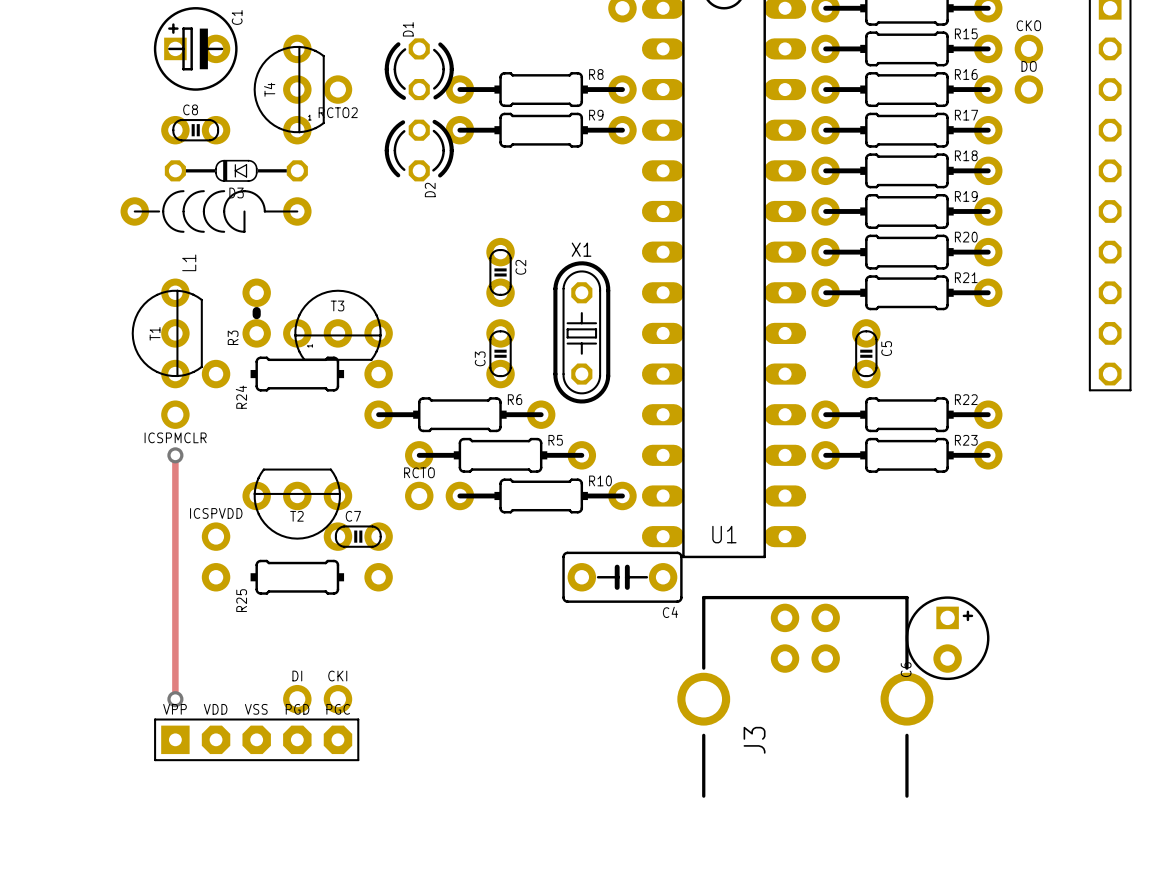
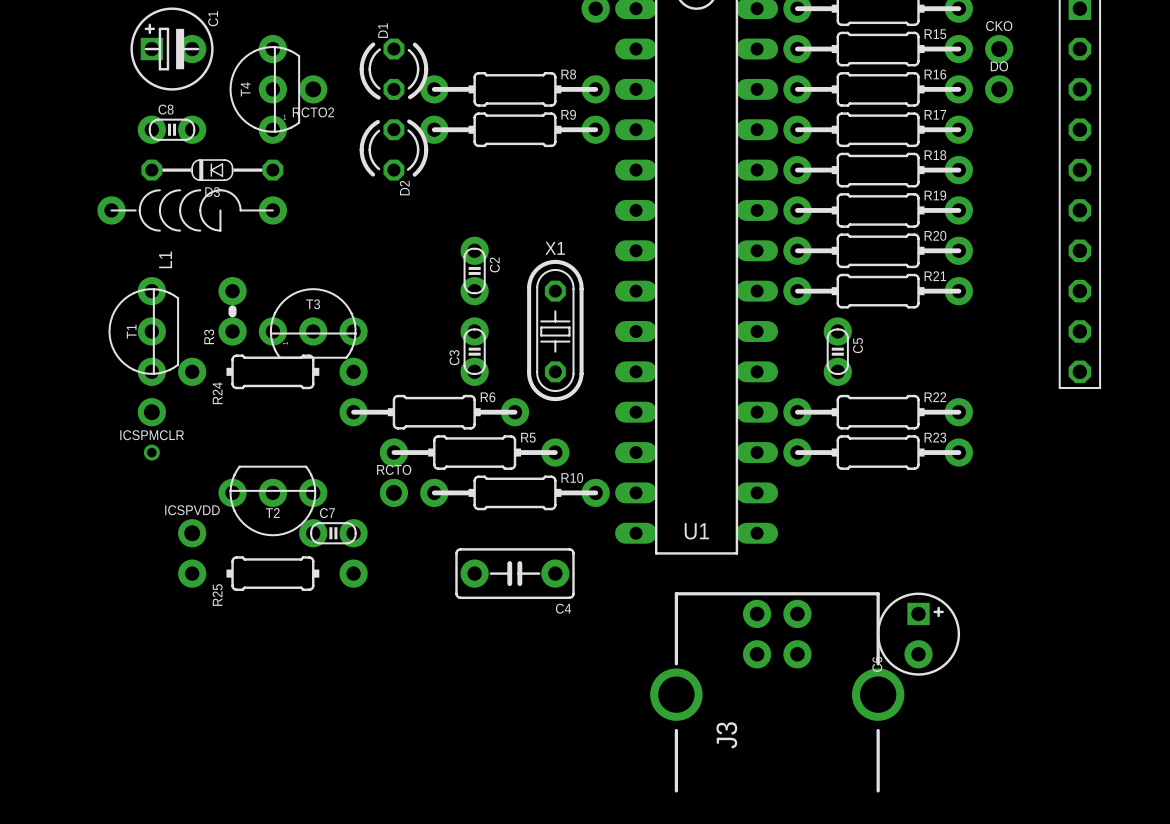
track: (175, 455) (175, 699) -> none
C4 position: (622, 577) -> (515, 573)
via: (175, 699) -> none
DI: (297, 699) -> none
CKI: (337, 699) -> none
part: (256, 739) -> none

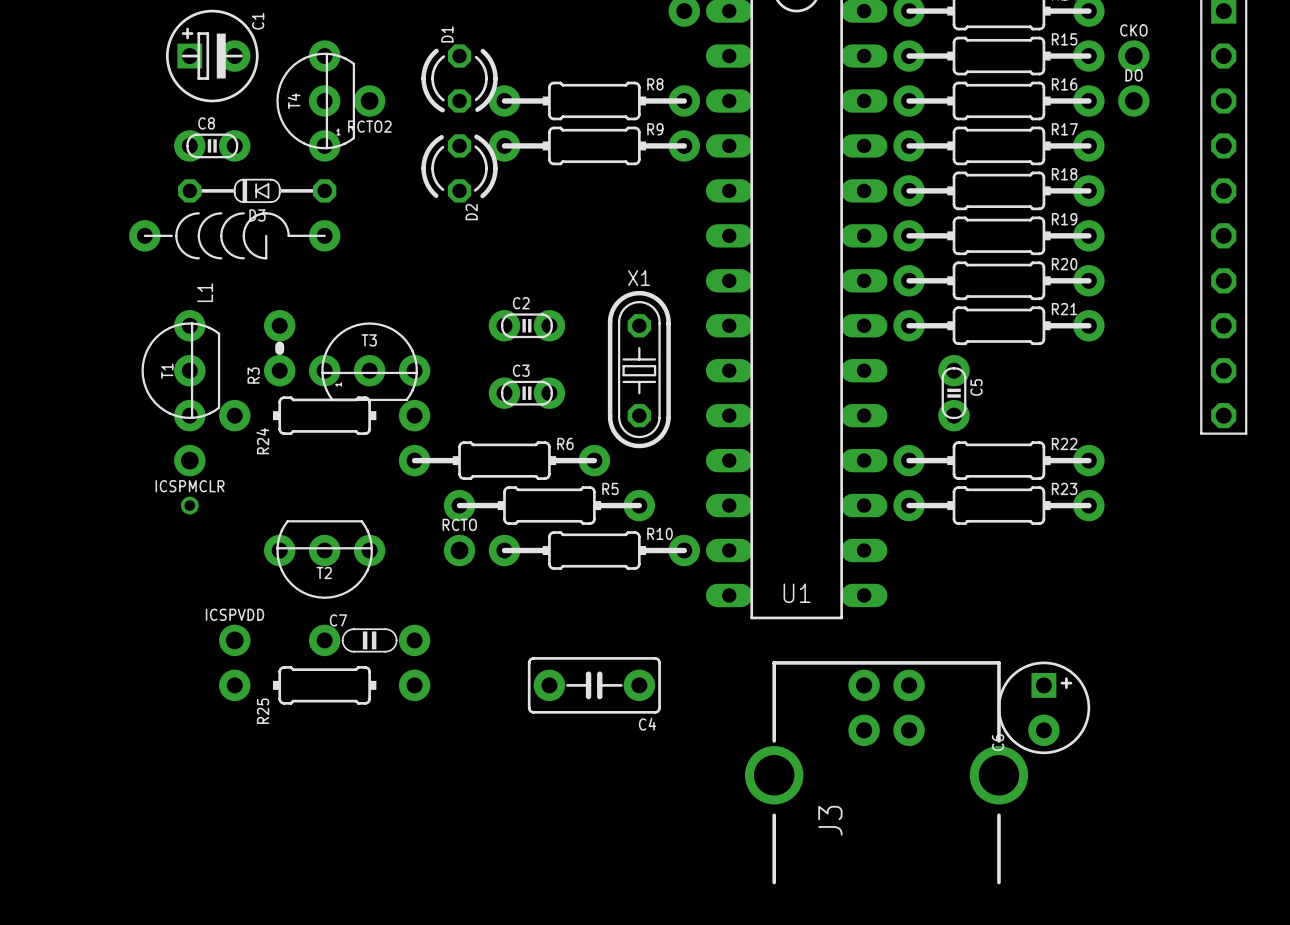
C2 rotation: 0° (474, 270) -> 90° clockwise (526, 325)
C3 rotation: 0° (474, 351) -> 90° clockwise (526, 393)
C7 footprint: [299, 519, 368, 548] -> [308, 624, 431, 657]
ICSPVDD position: (192, 533) -> (234, 640)
R25 position: (272, 573) -> (324, 685)
C4 position: (515, 573) -> (594, 685)

